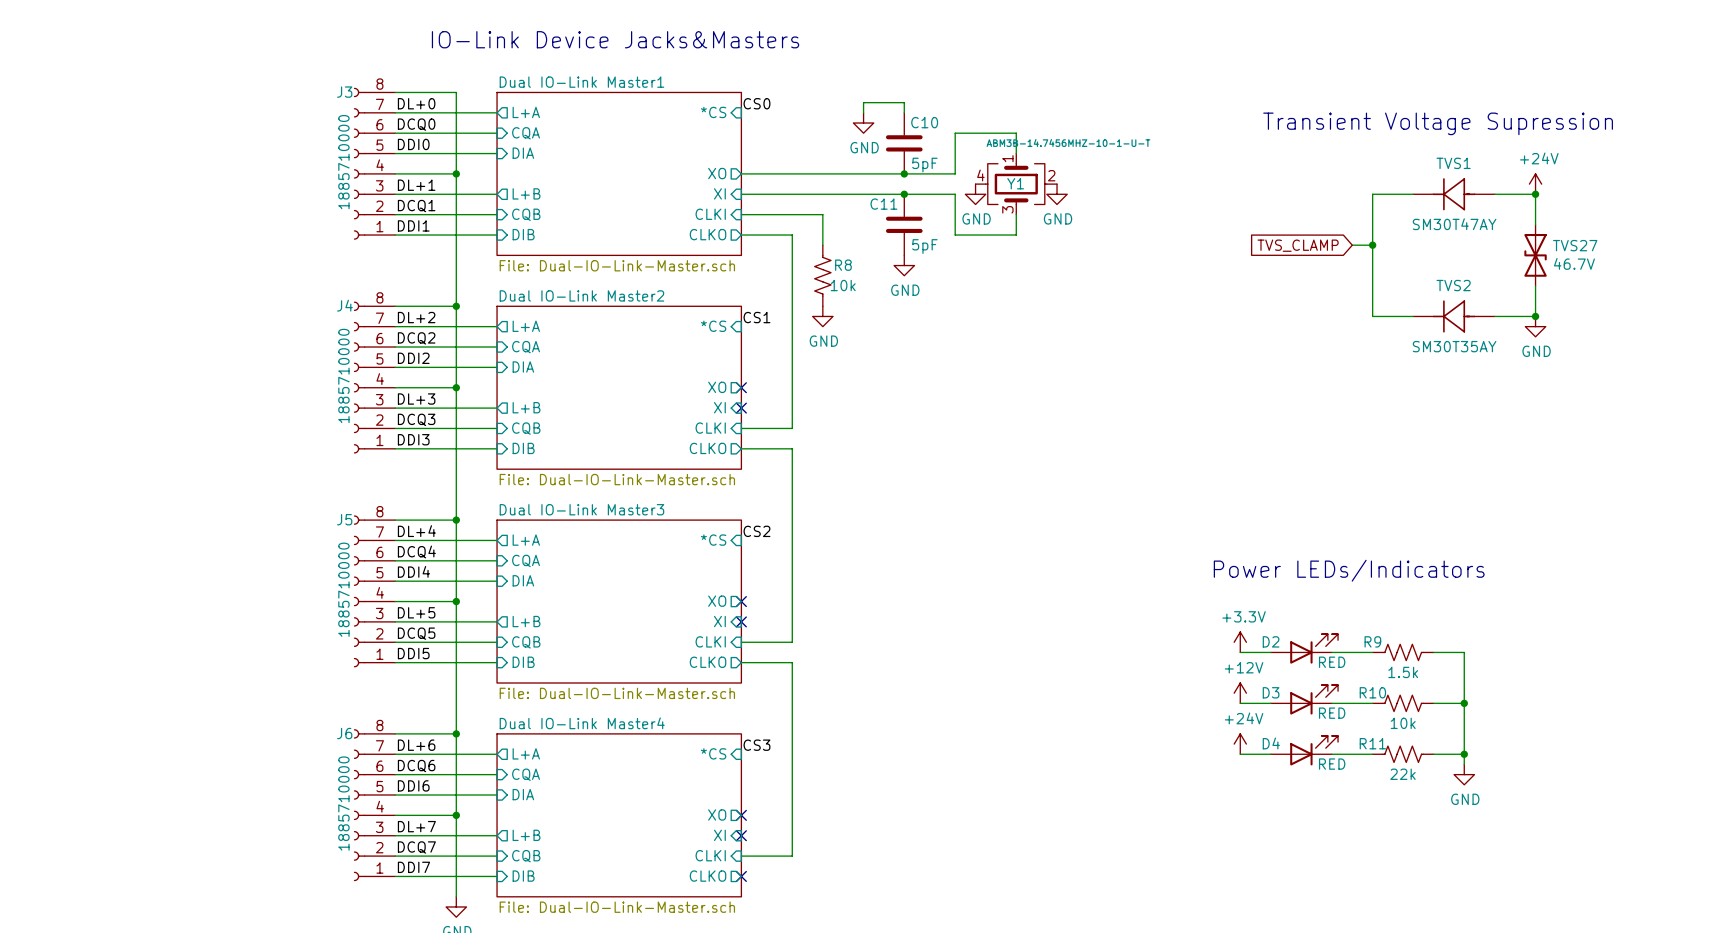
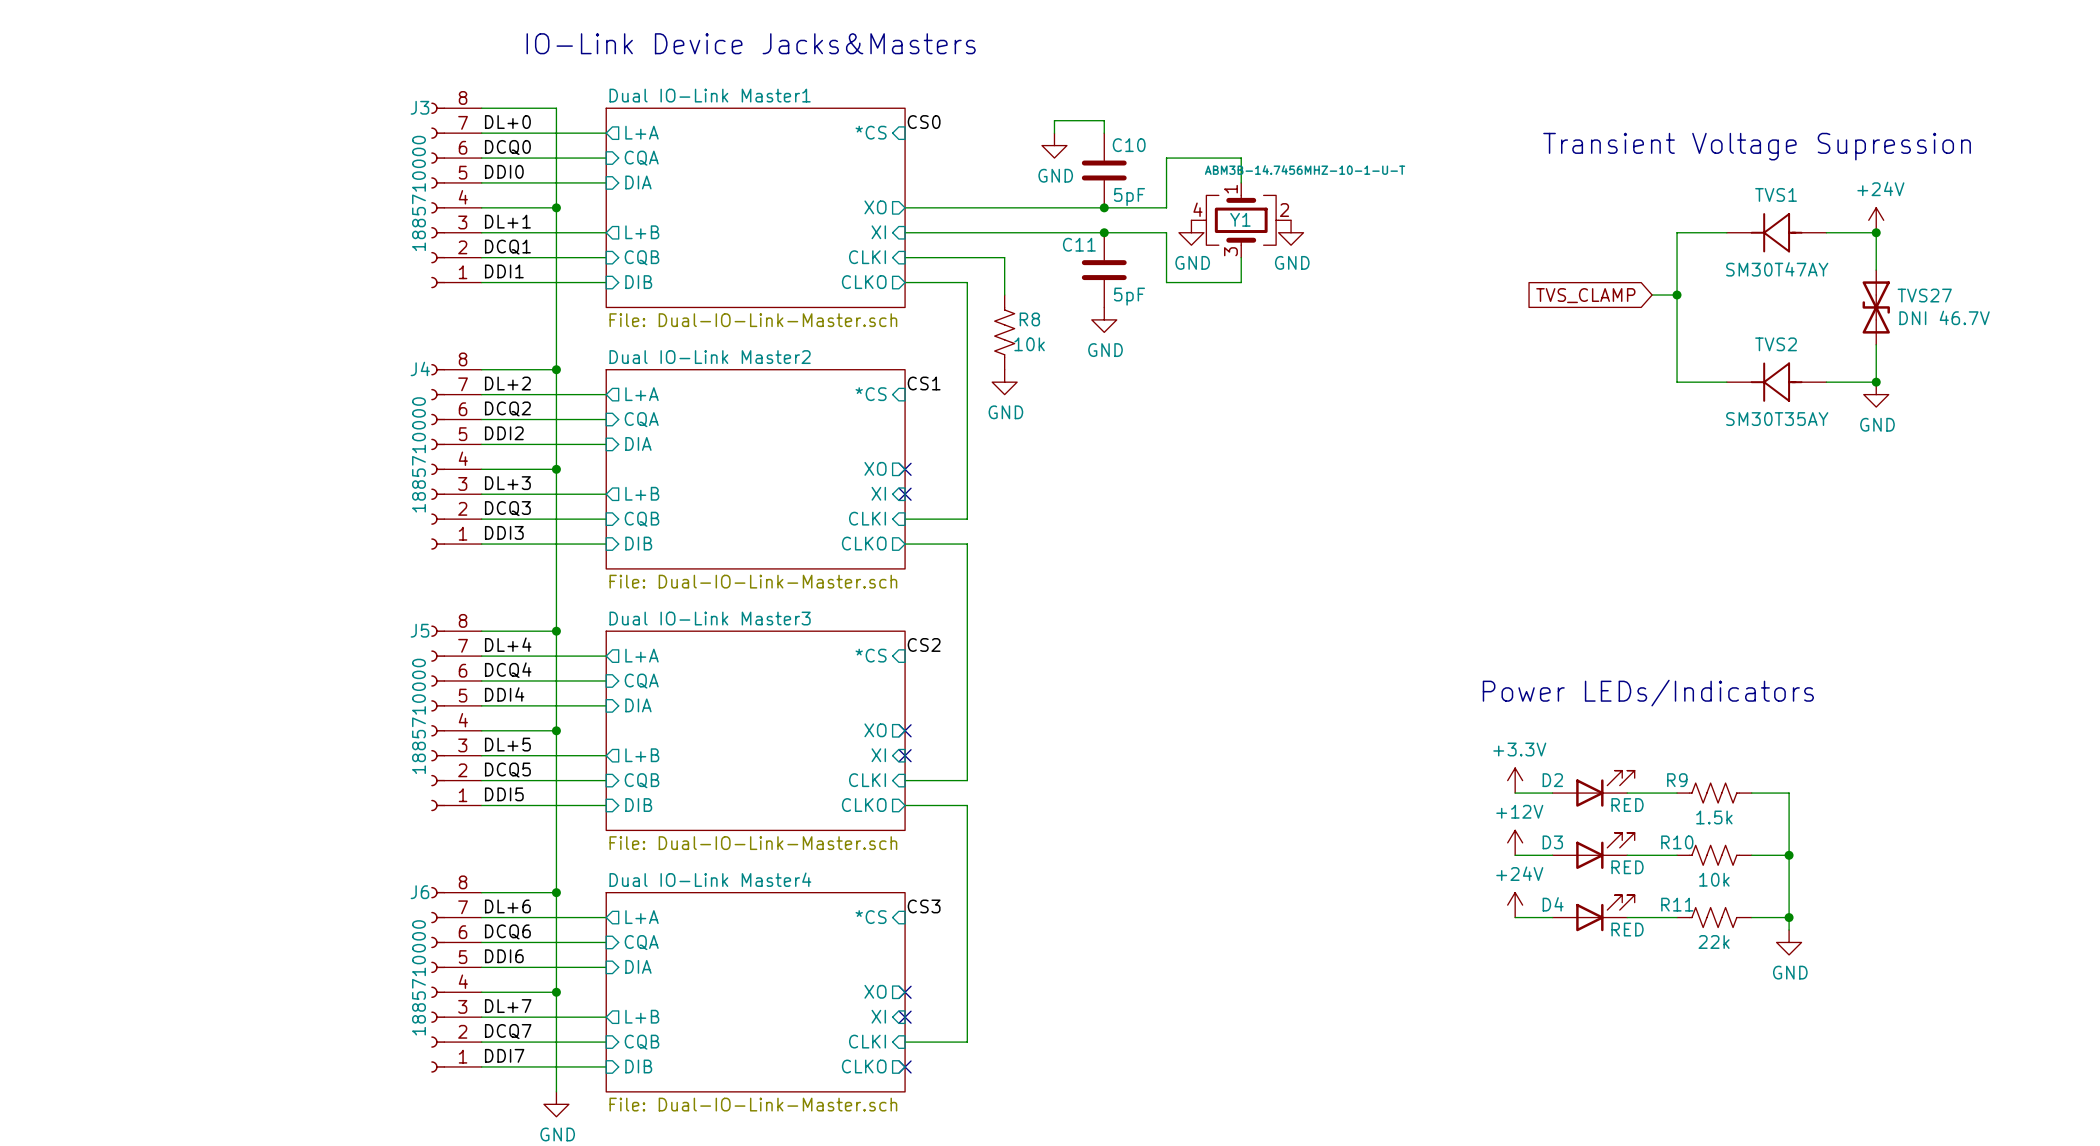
TVS27 value: 46.7V (1574, 263) -> DNI 46.7V (1944, 317)

